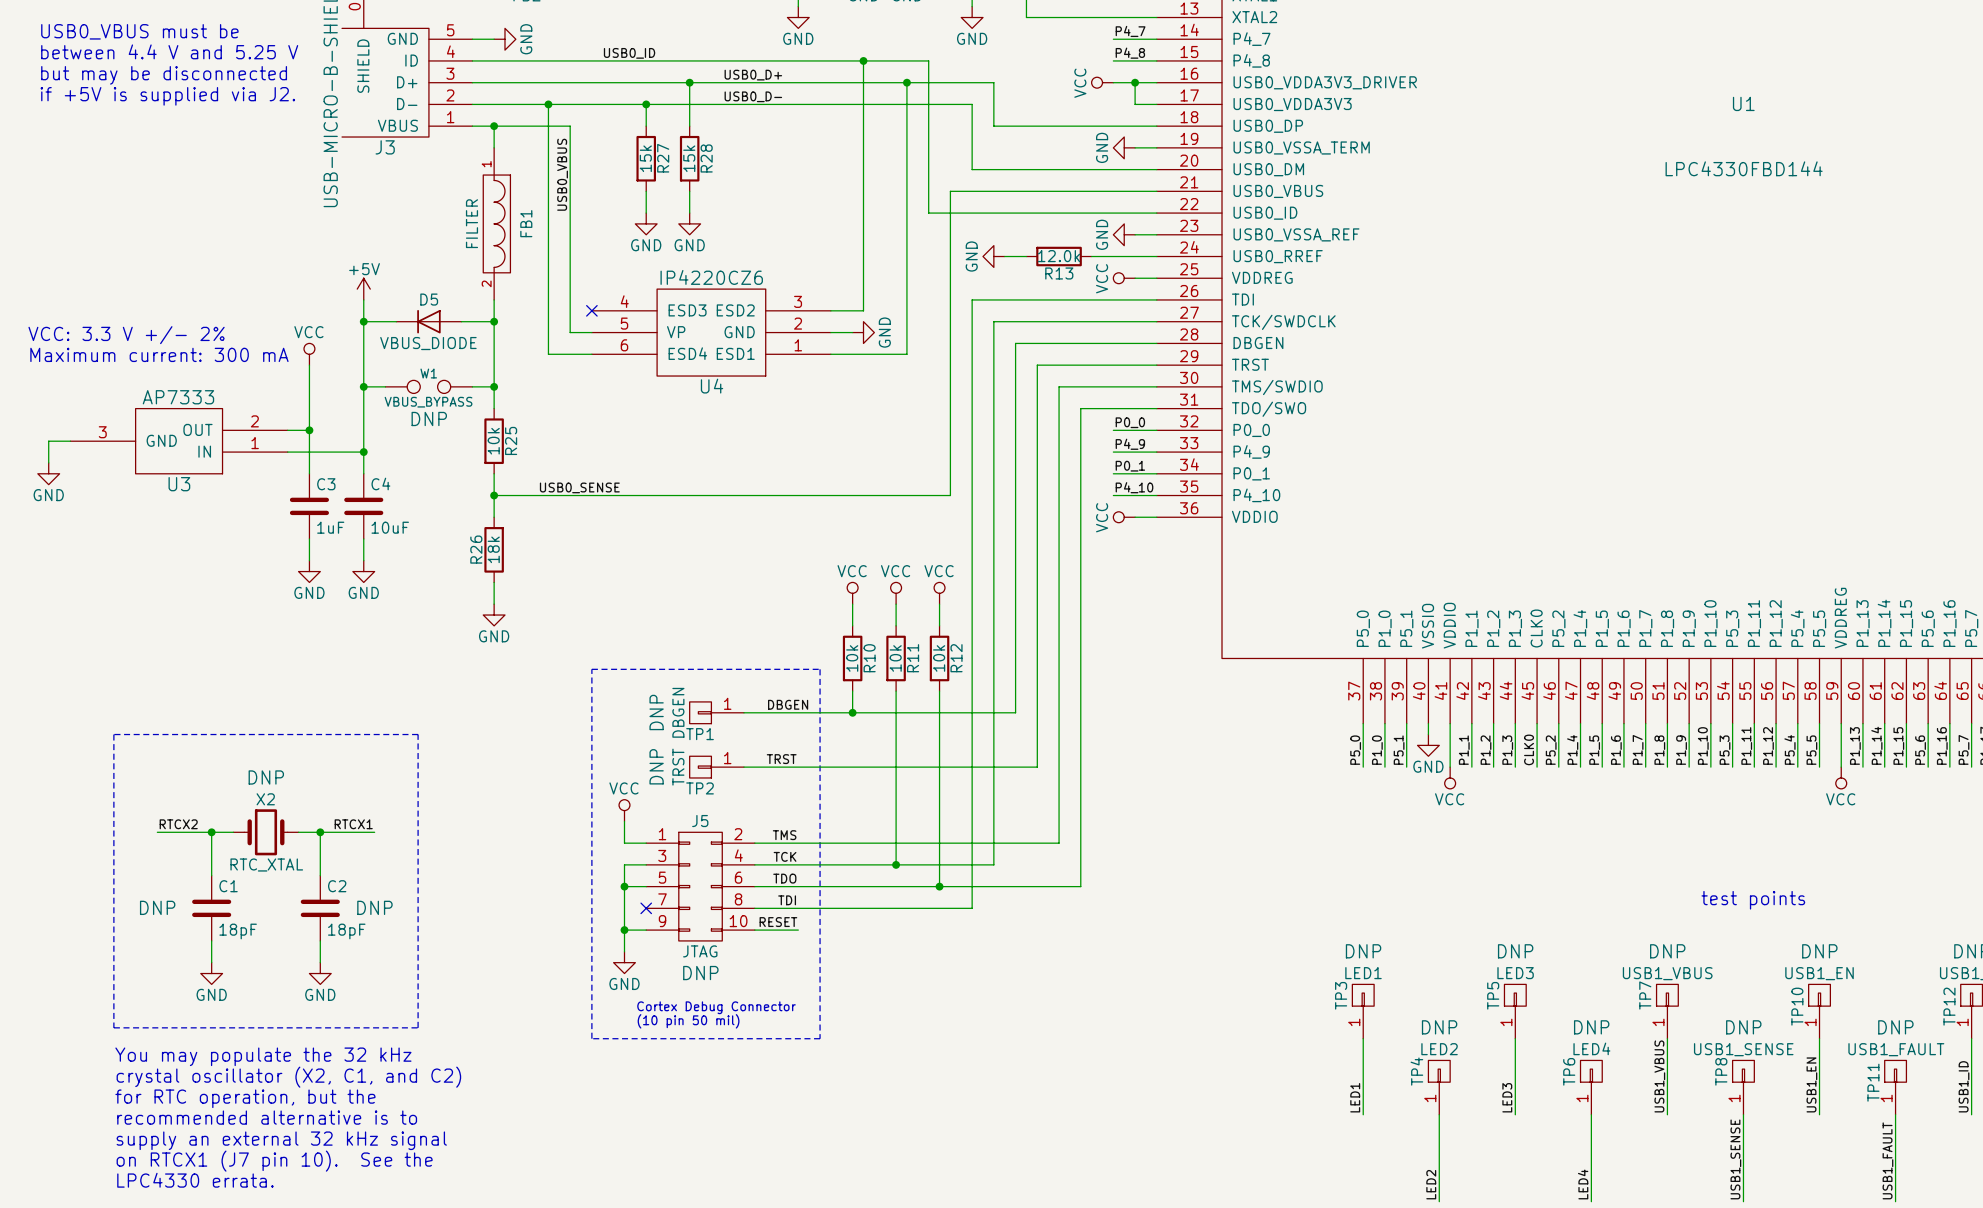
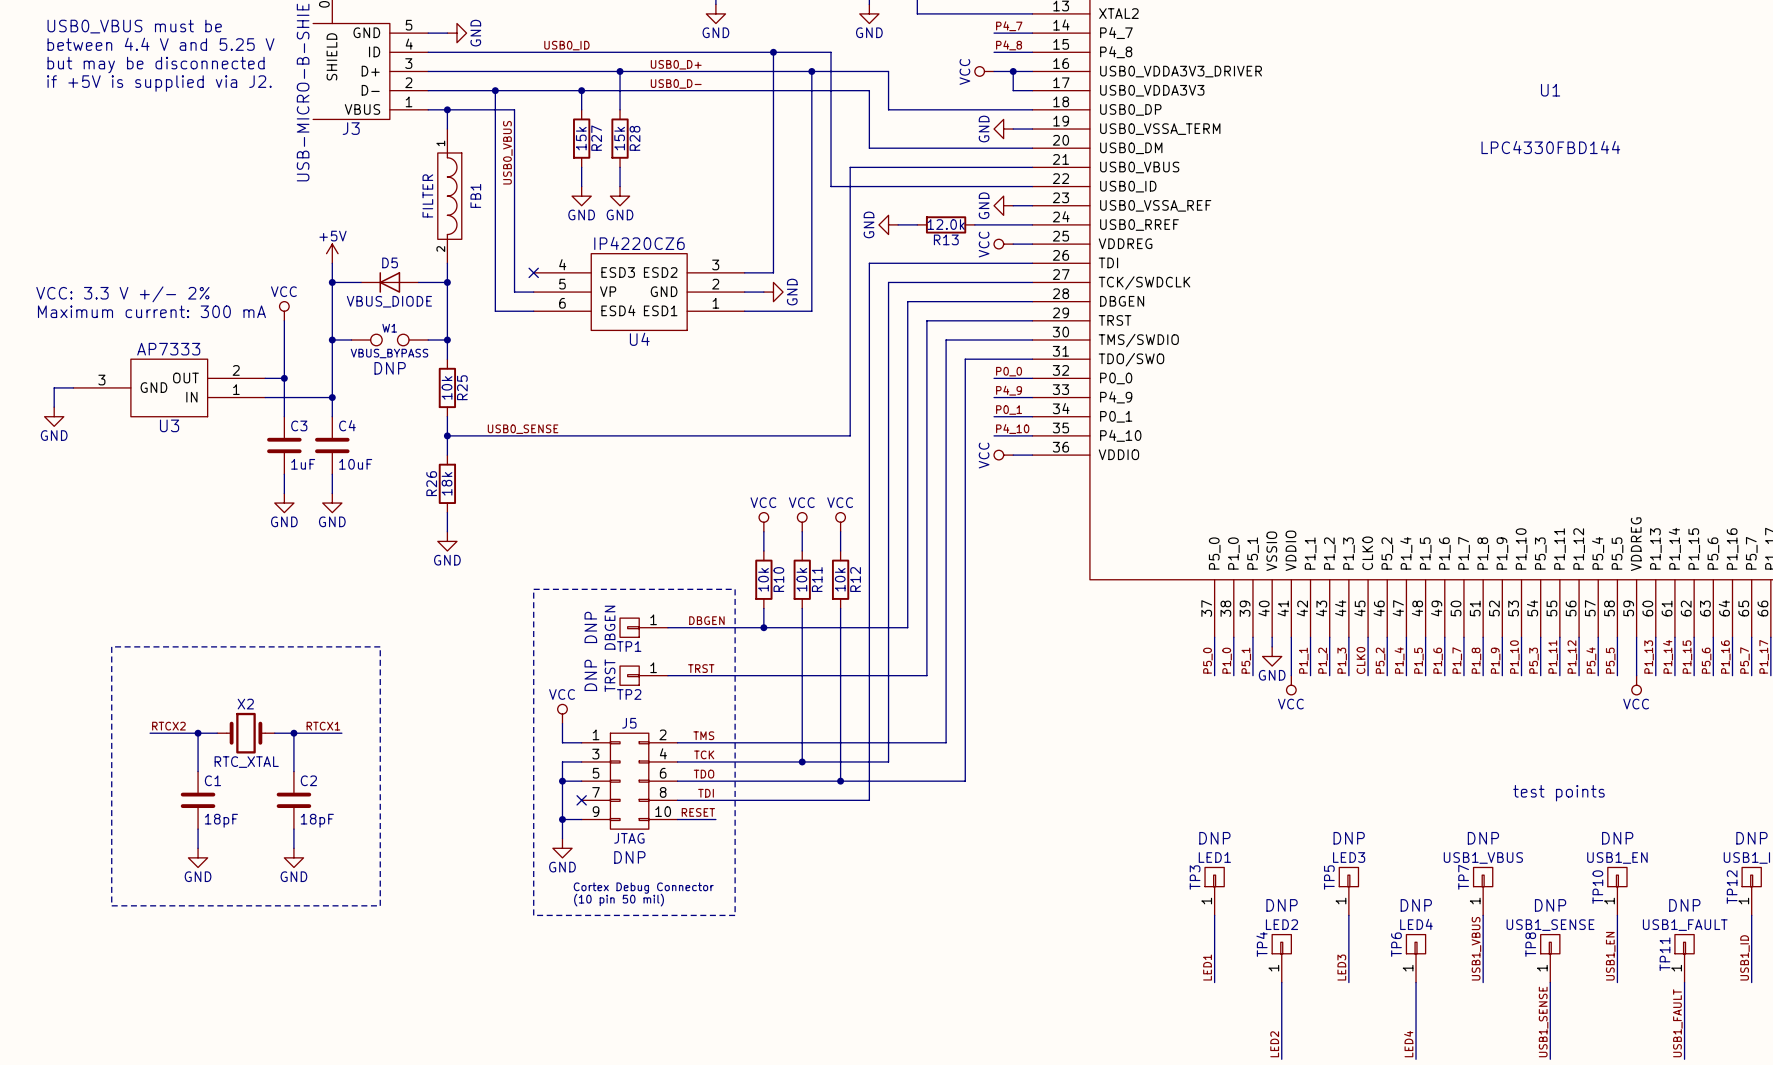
X2 text: DNP (266, 777) -> none
C1 text: DNP (157, 907) -> none
C2 text: DNP (374, 907) -> none
text: You may populate the 32 kHz (263, 1056) -> none
text: crystal oscillator (X2, C1, and C2) (288, 1077) -> none
text: for RTC operation, but the (245, 1098) -> none
text: recommended alternative is to (267, 1117) -> none
text: supply an external 32 kHz signal (281, 1140) -> none
text: on RTCX1 (J7 pin 10). See the (274, 1161) -> none
text: LPC4330 errata. (195, 1180) -> none

